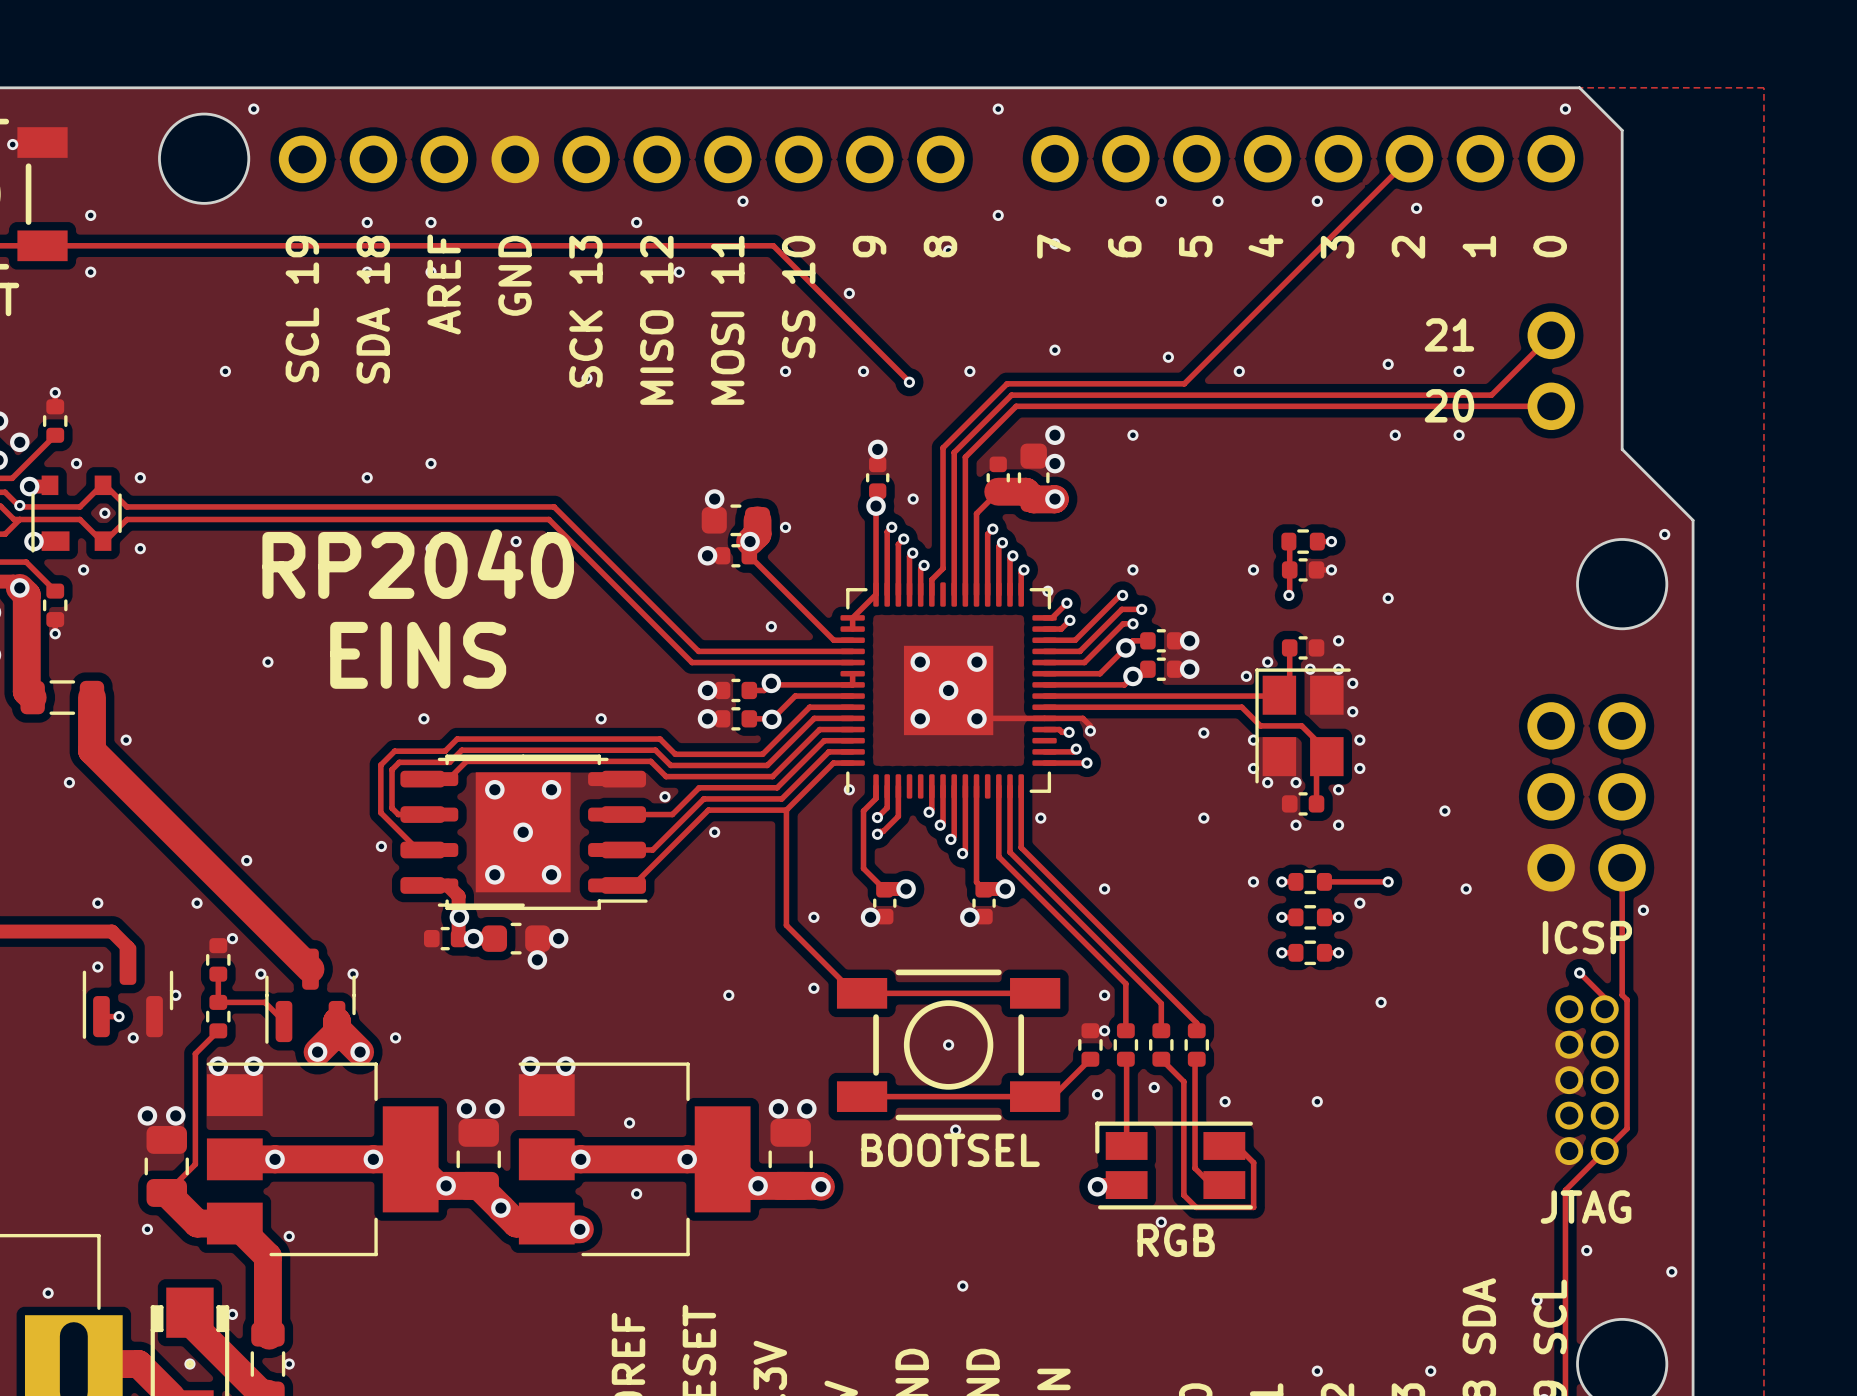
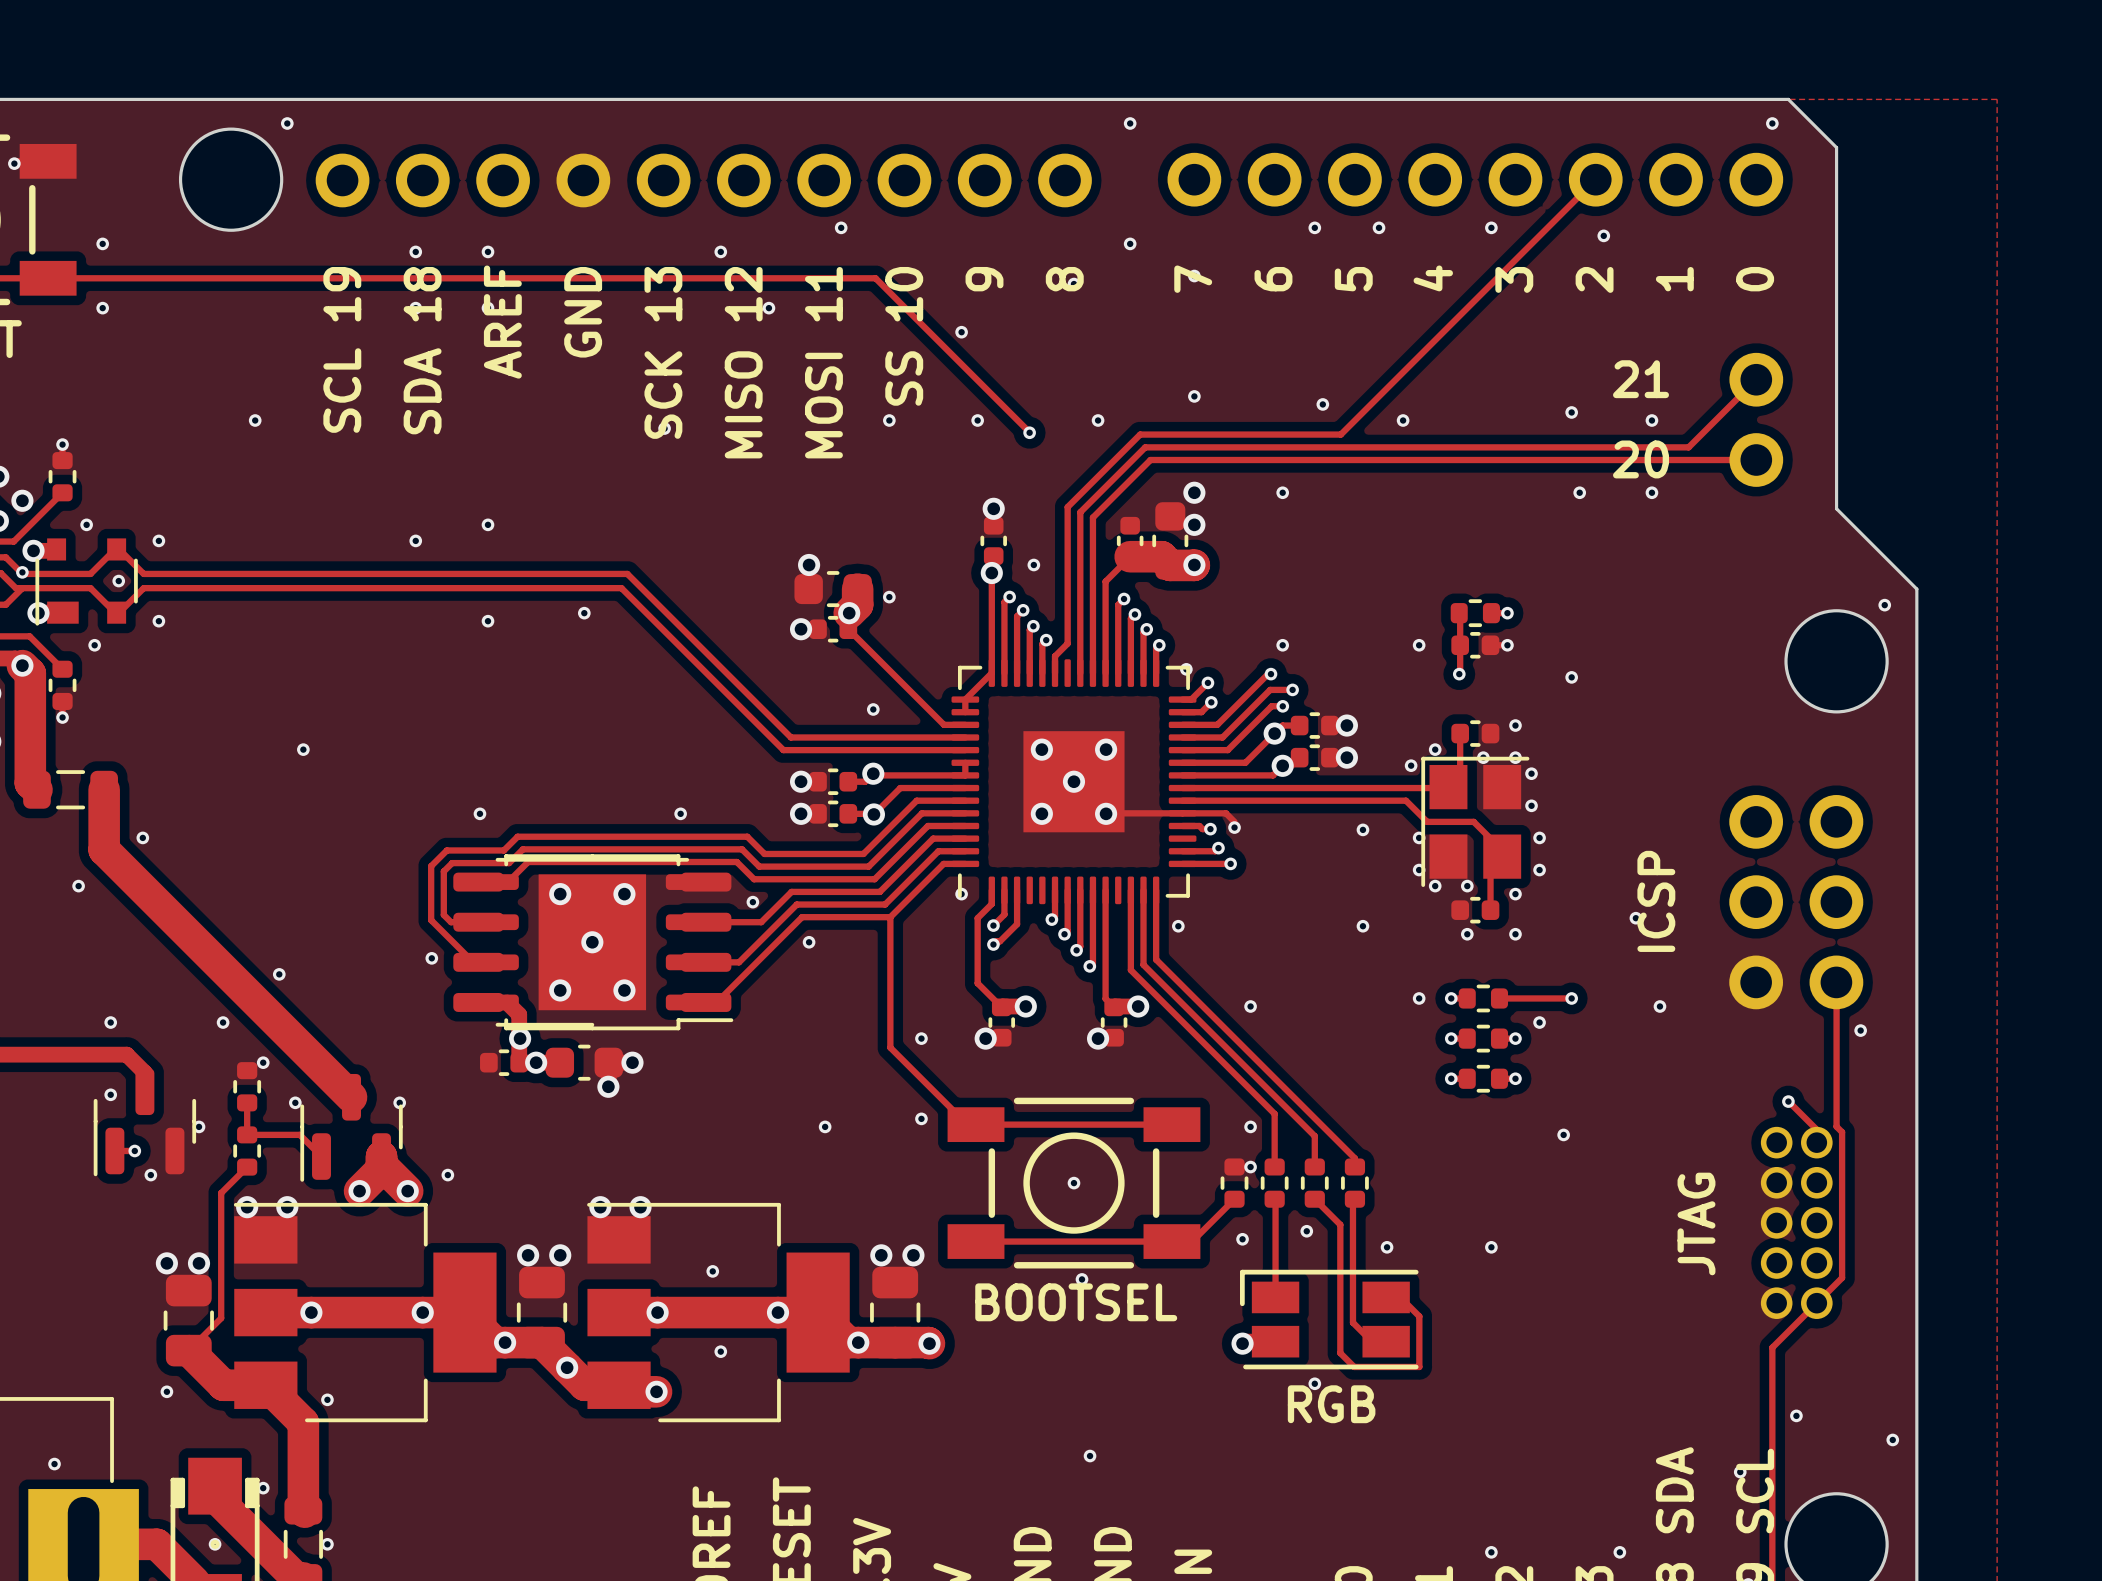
text: RP2040 (418, 564) -> none
text: EINS (418, 655) -> none
text rotation: 0° (1587, 937) -> 90° counterclockwise (1656, 901)
text position: ICSP (1587, 937) -> ICSP (1656, 901)
text rotation: 0° (1586, 1207) -> 90° counterclockwise (1696, 1223)
text position: JTAG (1586, 1207) -> JTAG (1696, 1223)

